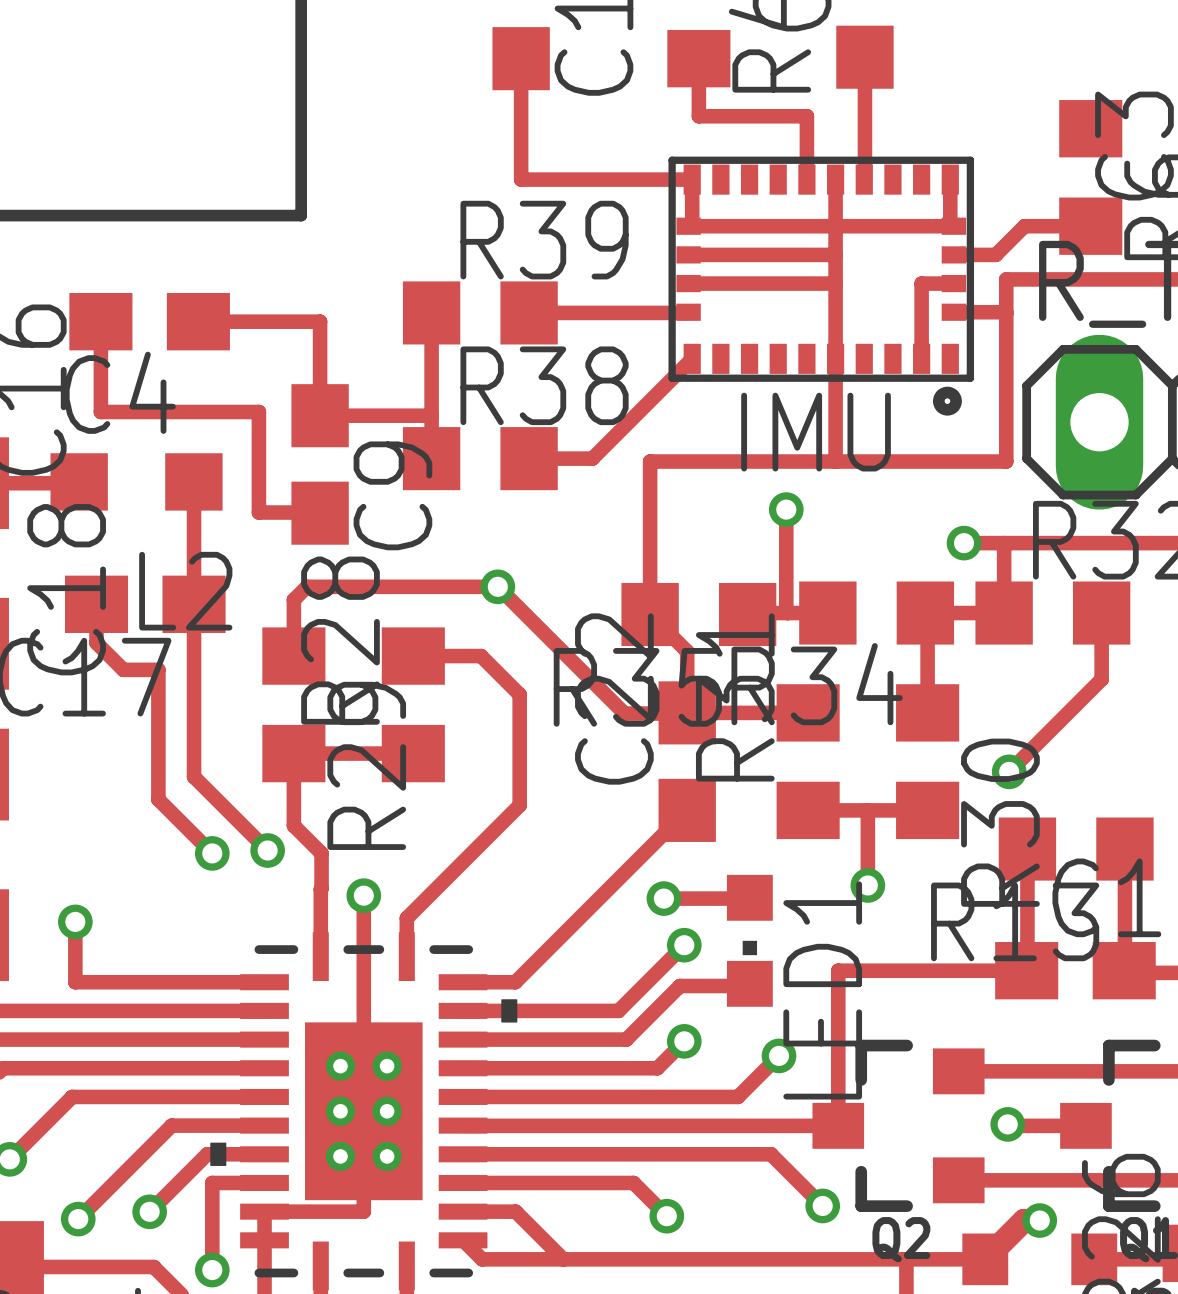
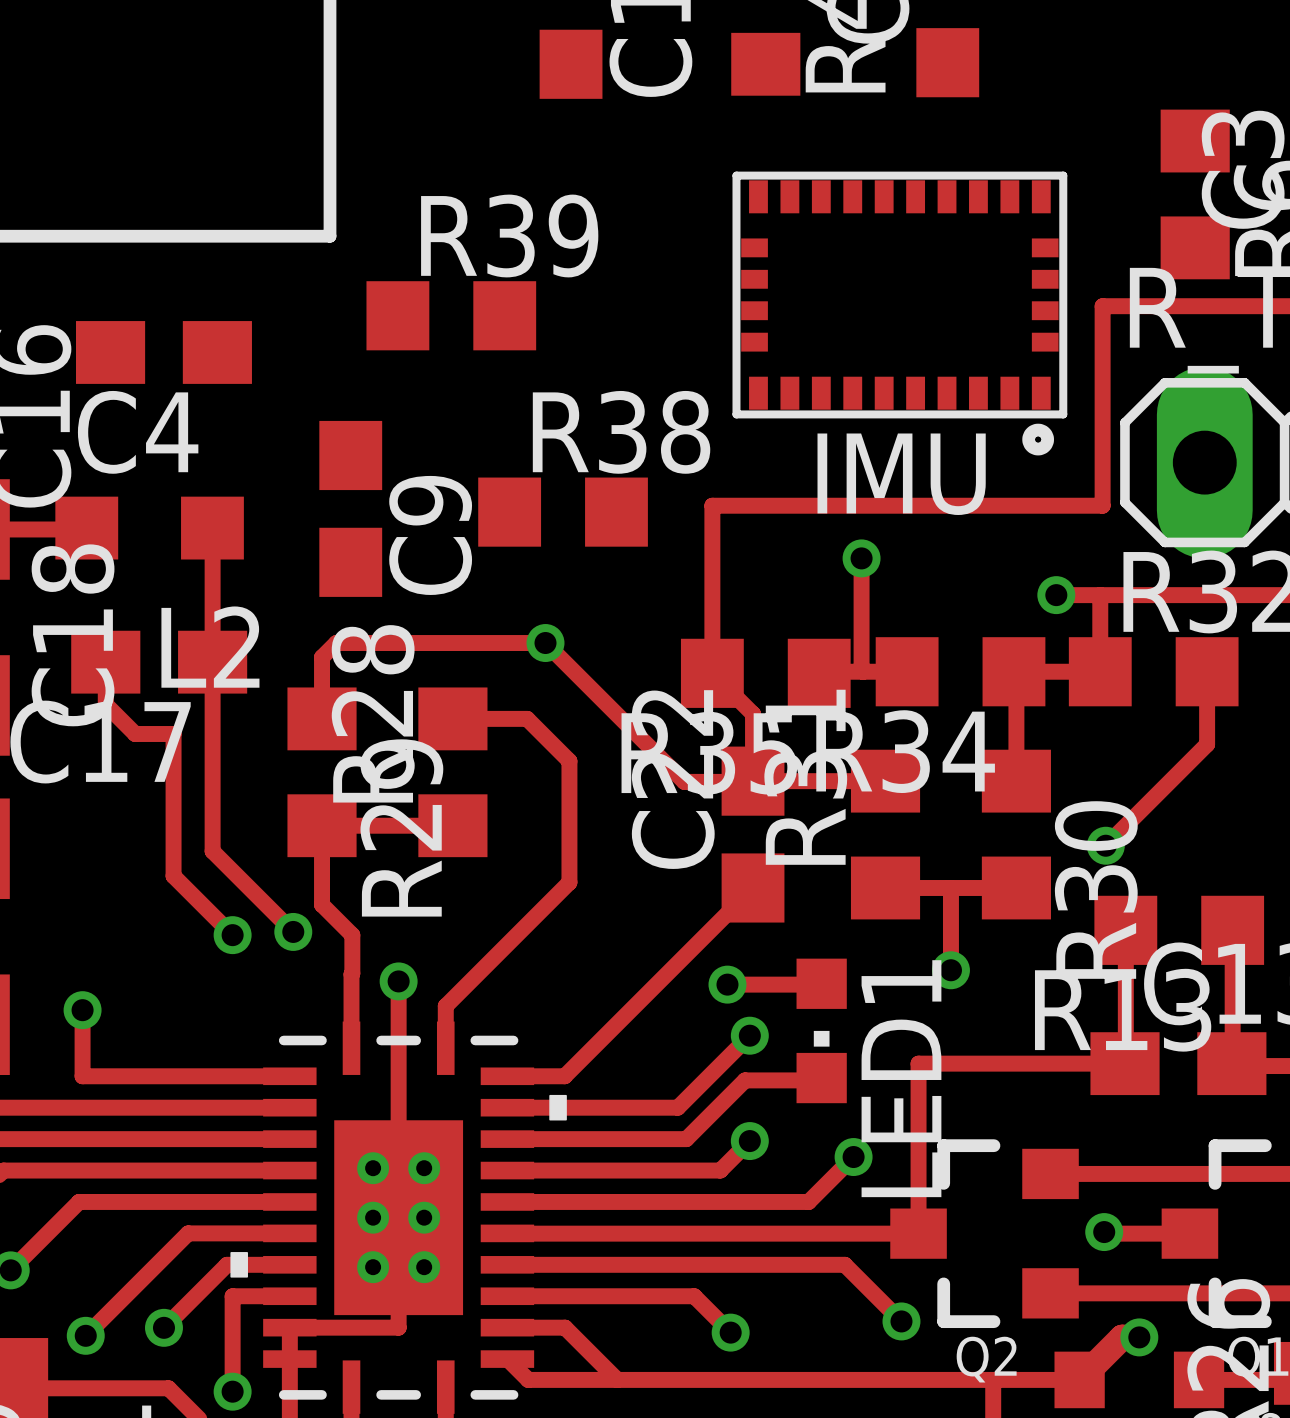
track: (864, 57) (864, 179) -> none
track: (521, 58) (521, 179) (692, 179) (692, 226) -> none
track: (698, 58) (698, 116) (806, 116) (806, 179) -> none
track: (835, 179) (835, 461) -> none
track: (950, 179) (950, 226) -> none
track: (688, 226) (953, 226) -> none
track: (1090, 226) (1024, 226) (995, 254) (953, 254) -> none
track: (688, 254) (835, 254) -> none
track: (688, 283) (835, 283) -> none
track: (953, 283) (921, 283) (921, 358) -> none
track: (431, 312) (431, 458) -> none
R39 position: (480, 312) -> (451, 315)
track: (529, 312) (688, 312) -> none
track: (953, 312) (1005, 312) -> none
track: (100, 321) (100, 412) (258, 412) (258, 512) (320, 512) -> none
track: (198, 321) (320, 321) (320, 415) (431, 415) -> none
track: (692, 358) (592, 458) (529, 458) -> none
R38 position: (480, 458) -> (563, 512)

